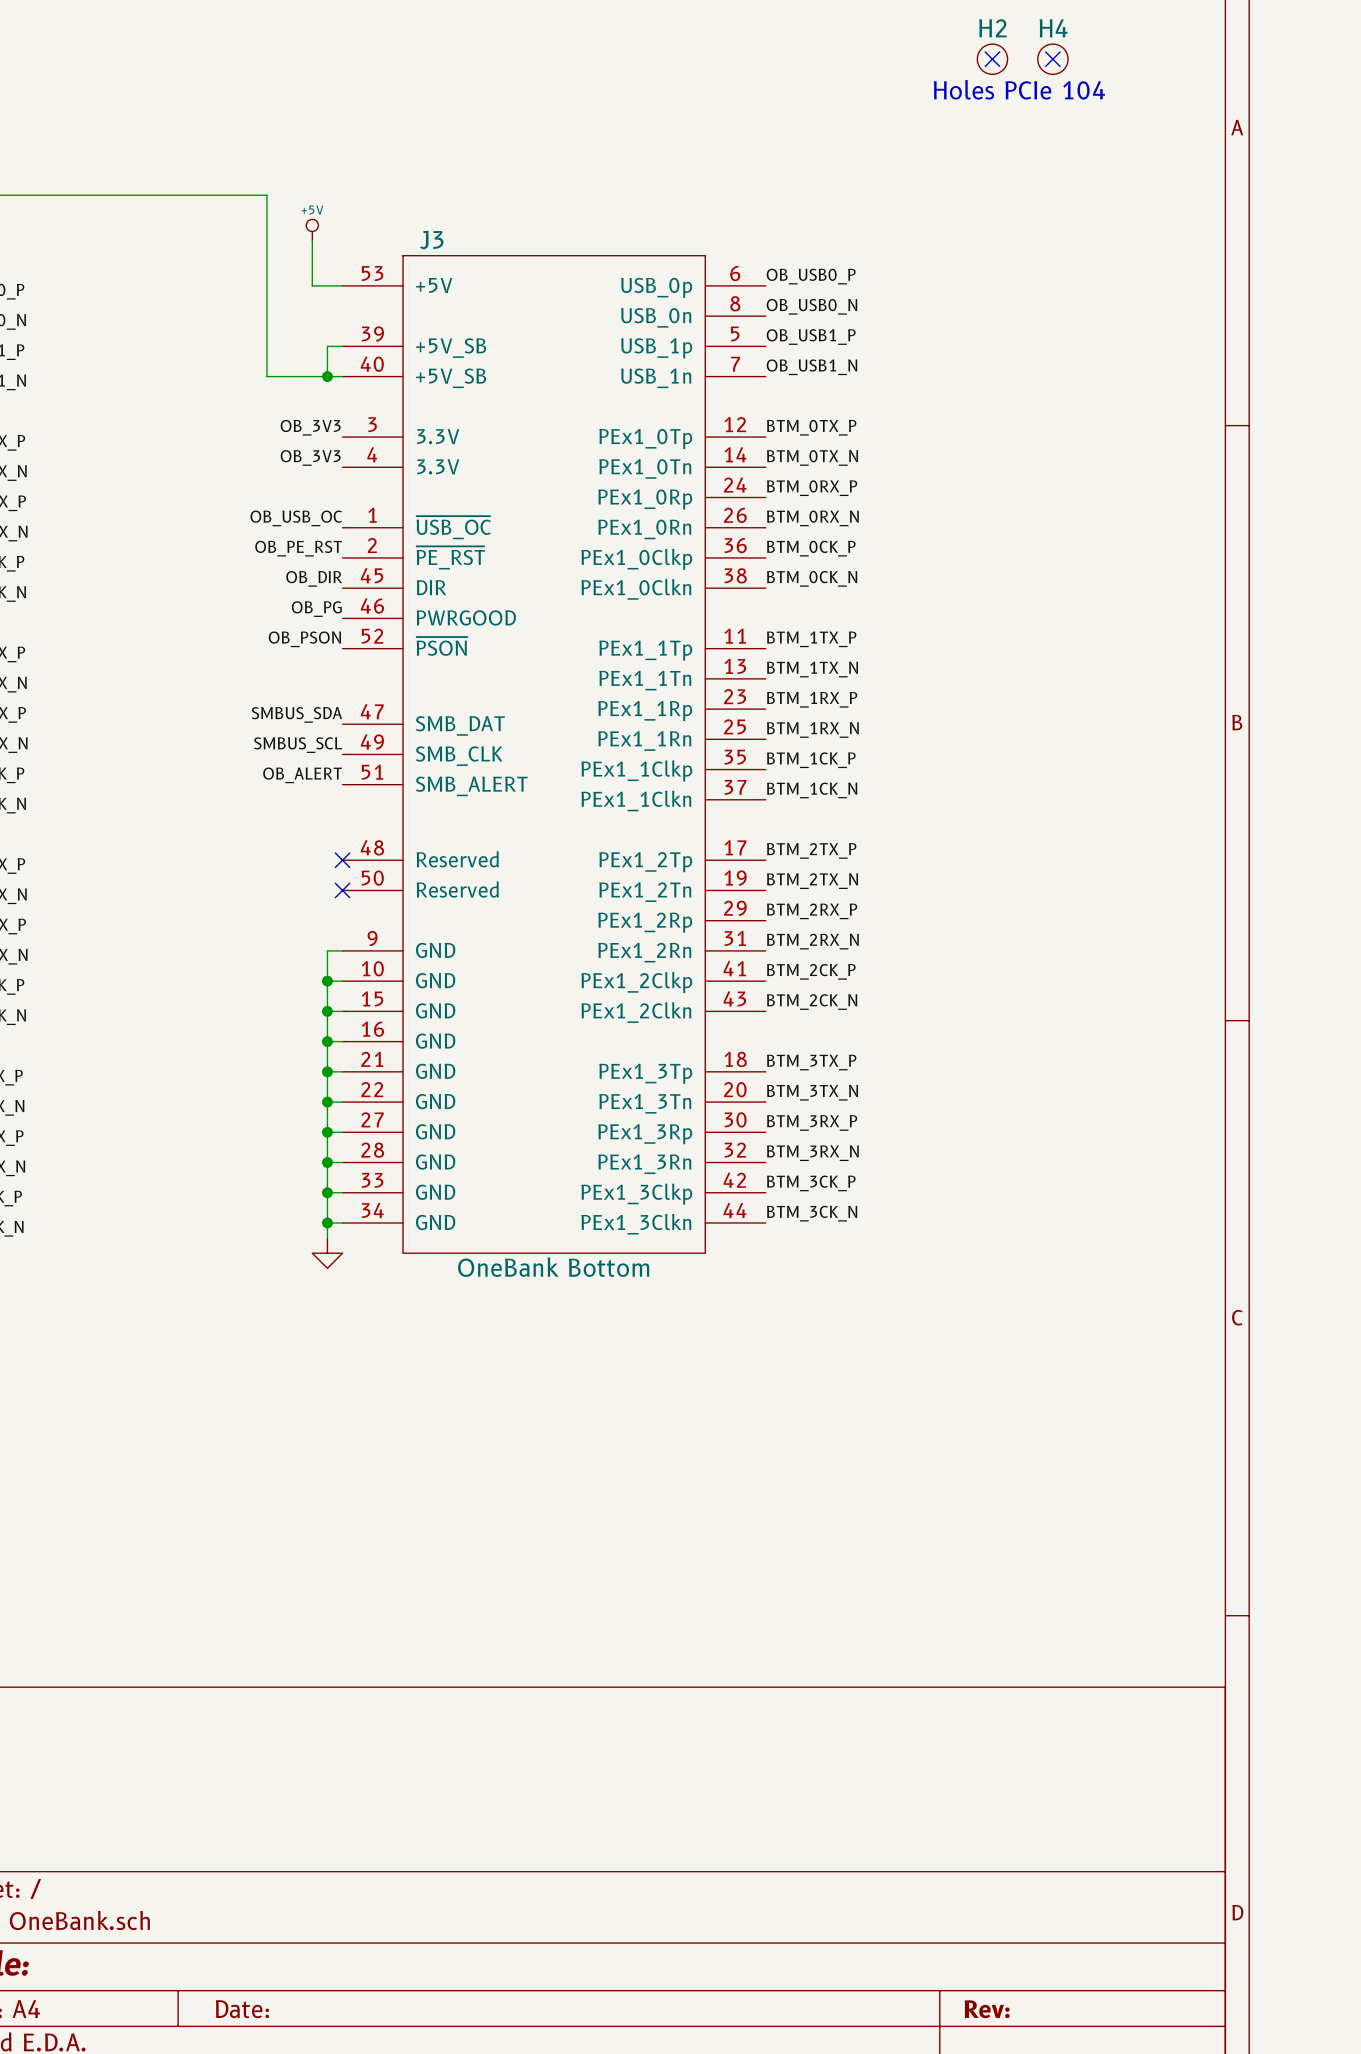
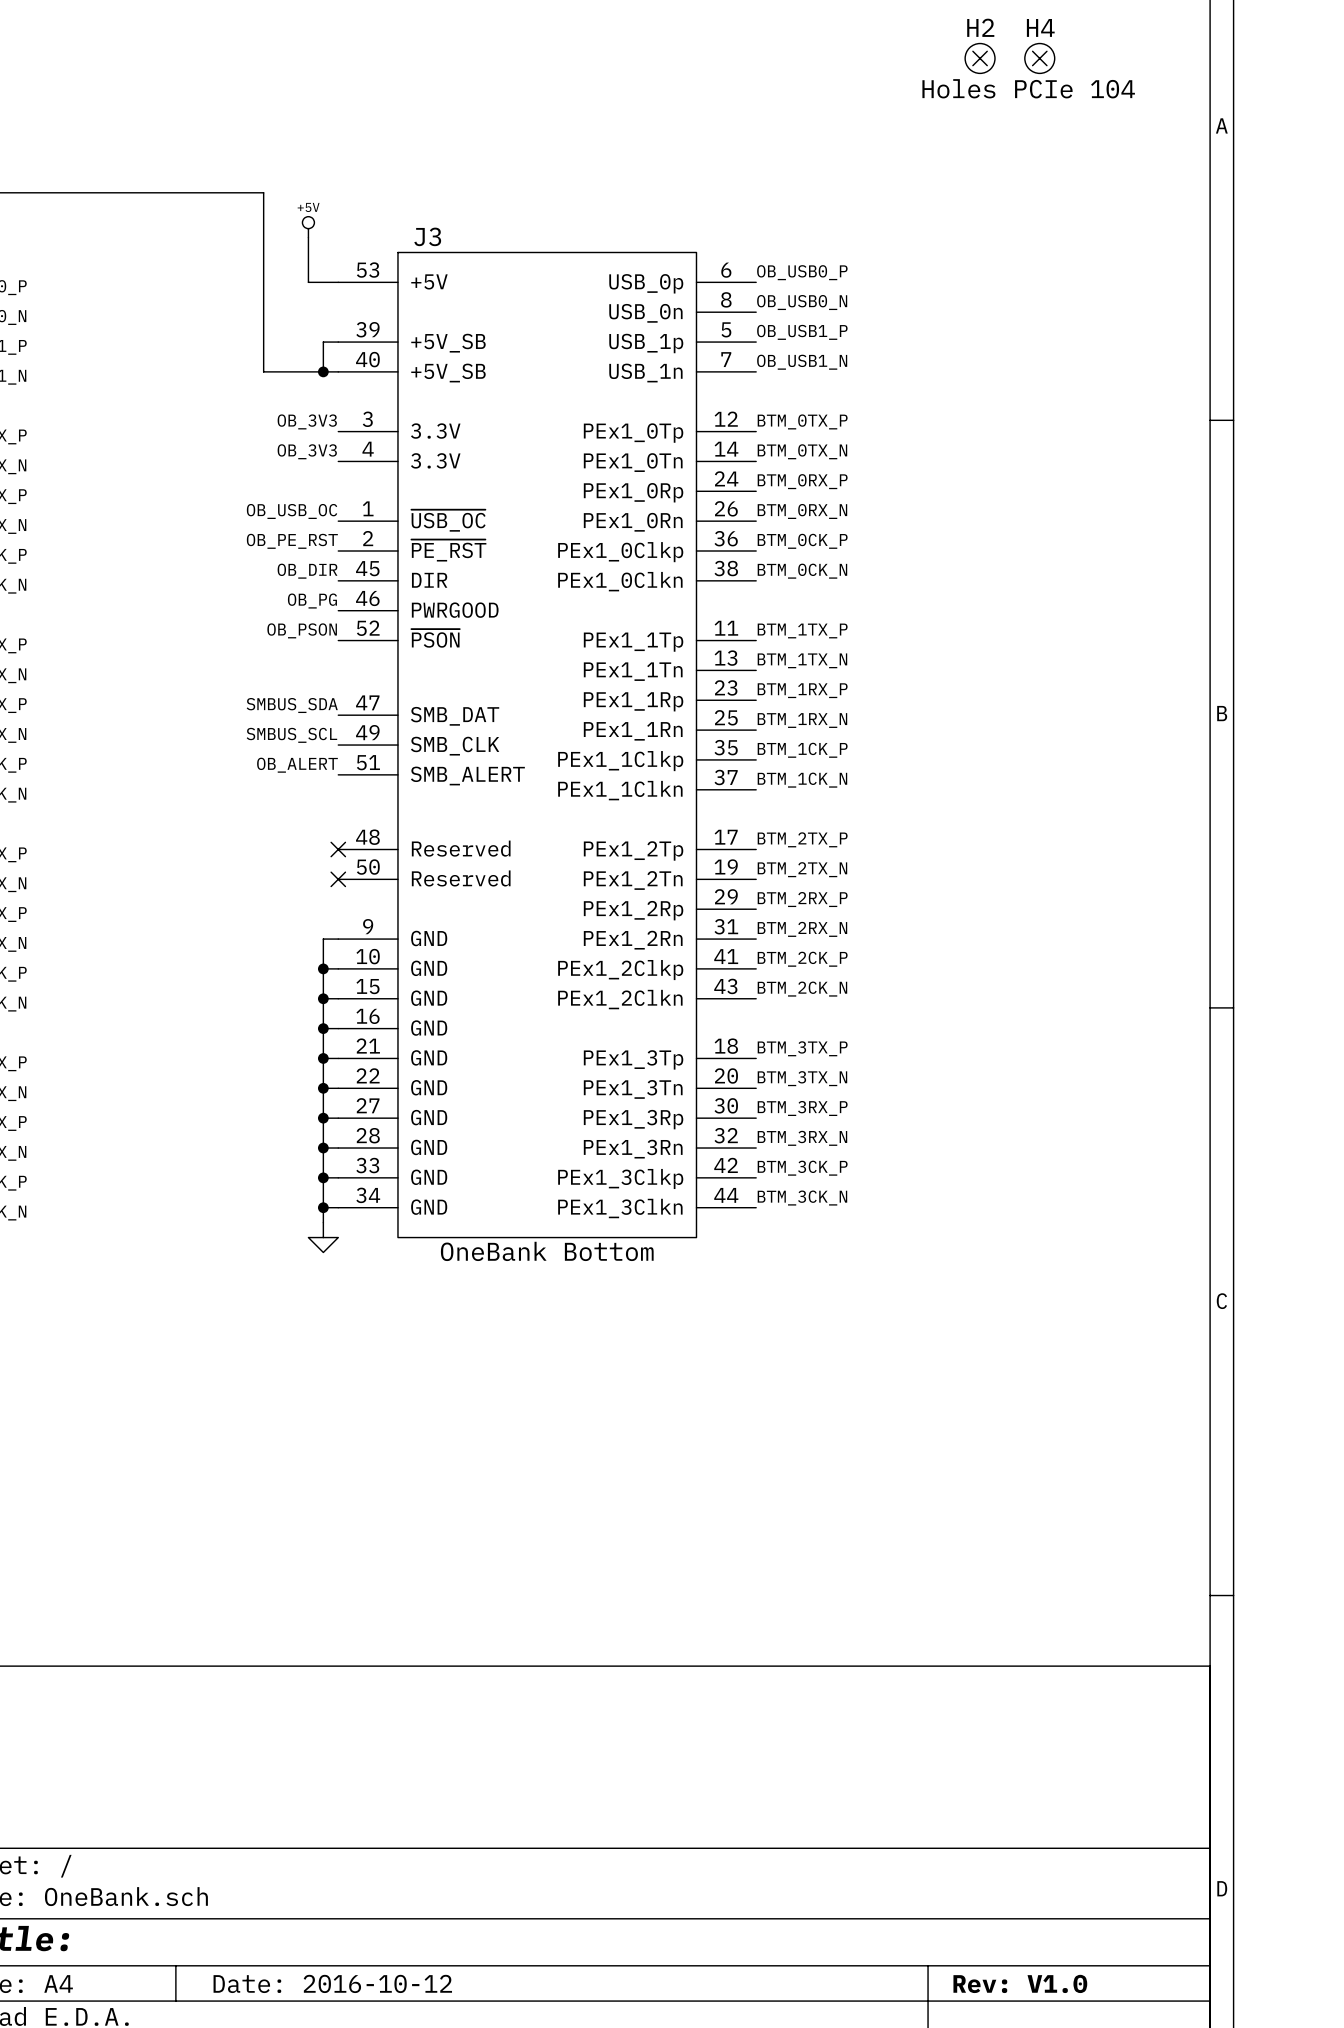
title block: Date: (242, 2009) -> Date: 2016-10-12 (332, 1983)
title block: Rev: (987, 2009) -> Rev: V1.0 (1020, 1983)

